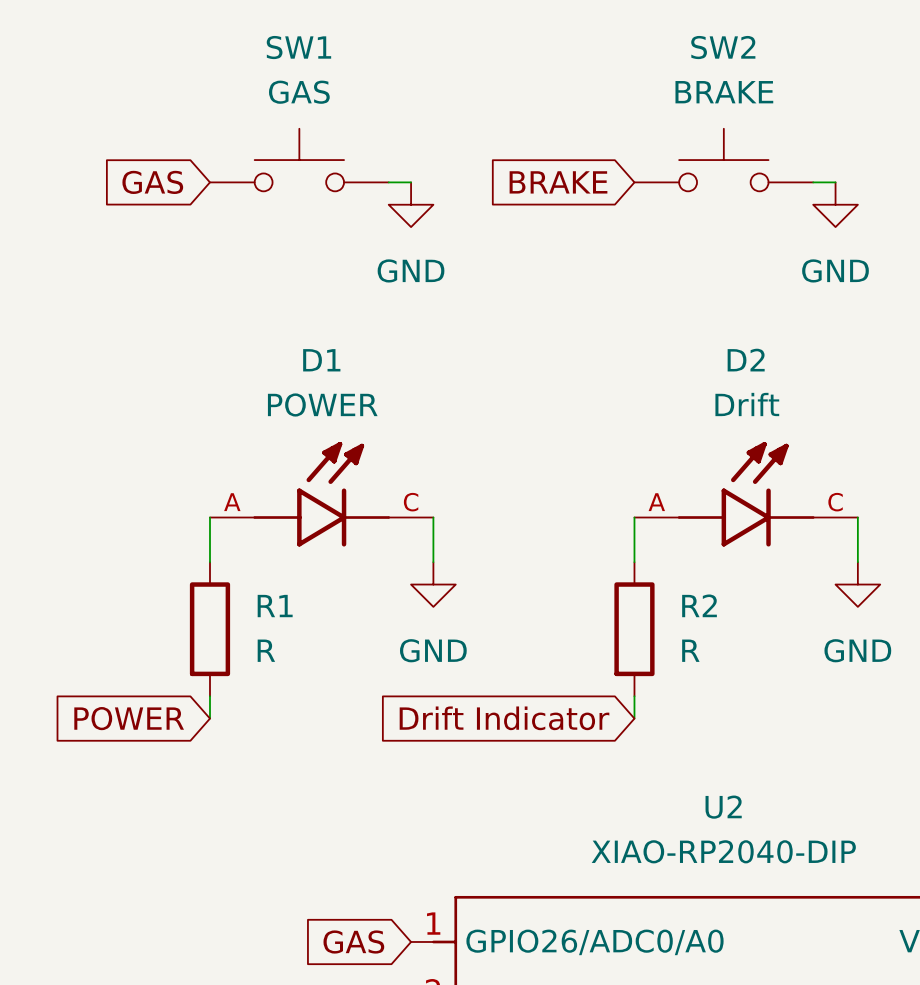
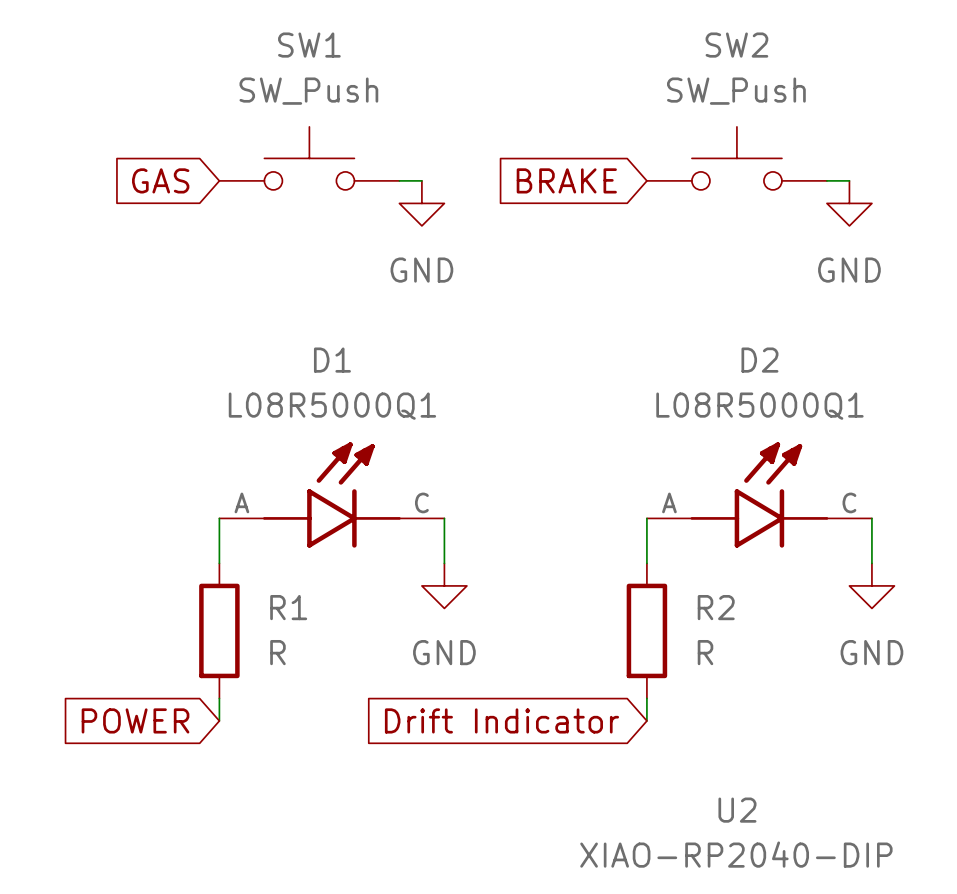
SW1 value: GAS (299, 92) -> SW_Push (308, 91)
SW2 value: BRAKE (724, 92) -> SW_Push (736, 91)
D1 value: POWER (322, 404) -> L08R5000Q1 (332, 406)
D2 value: Drift (747, 404) -> L08R5000Q1 (759, 406)

